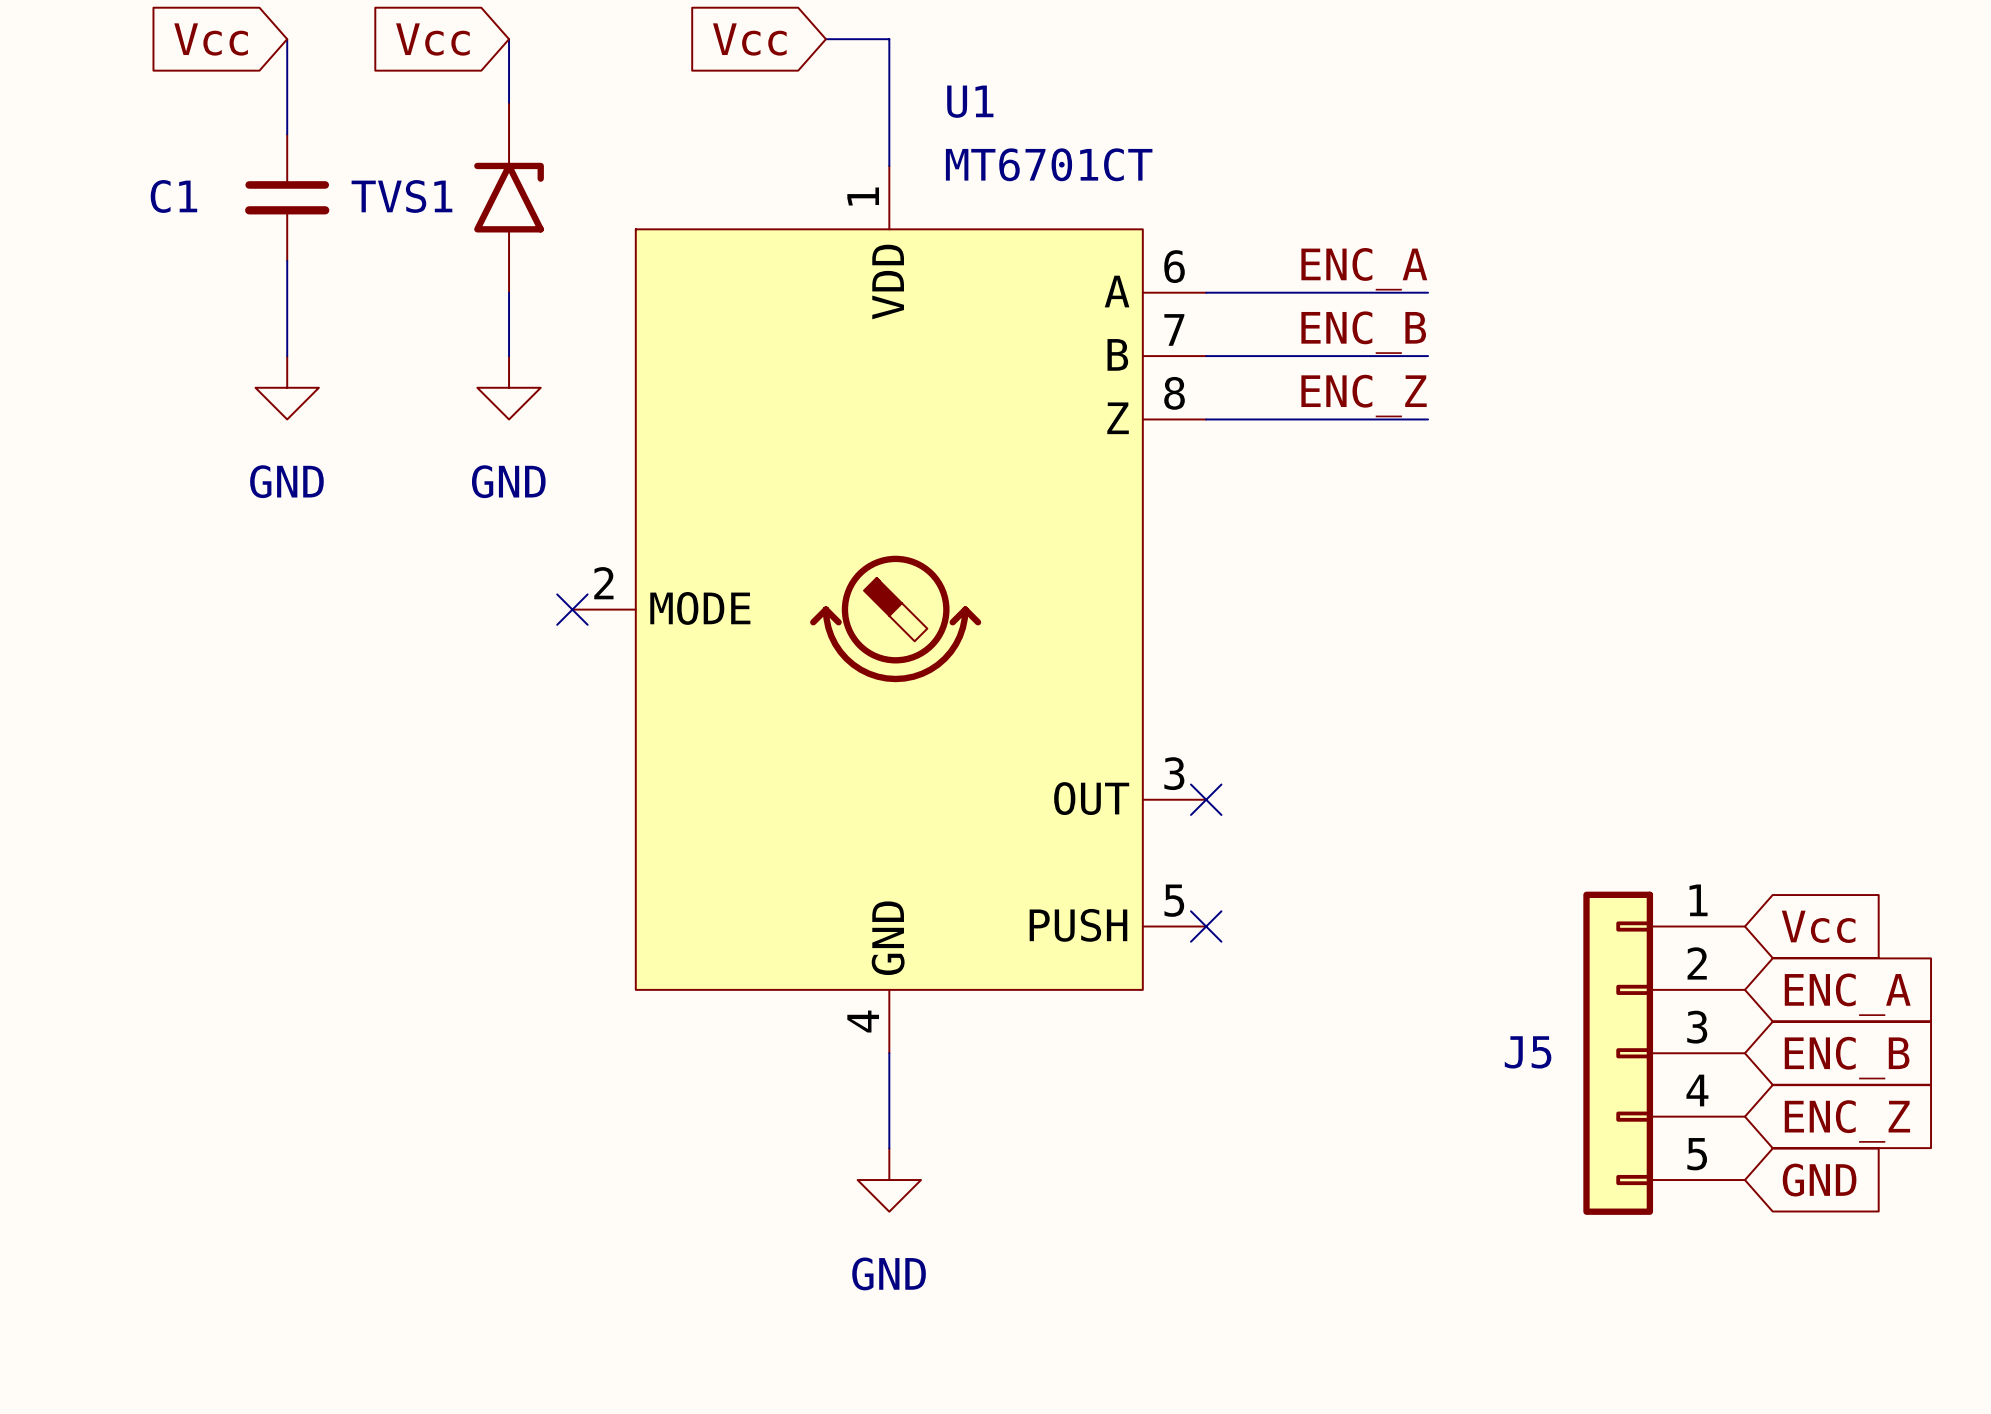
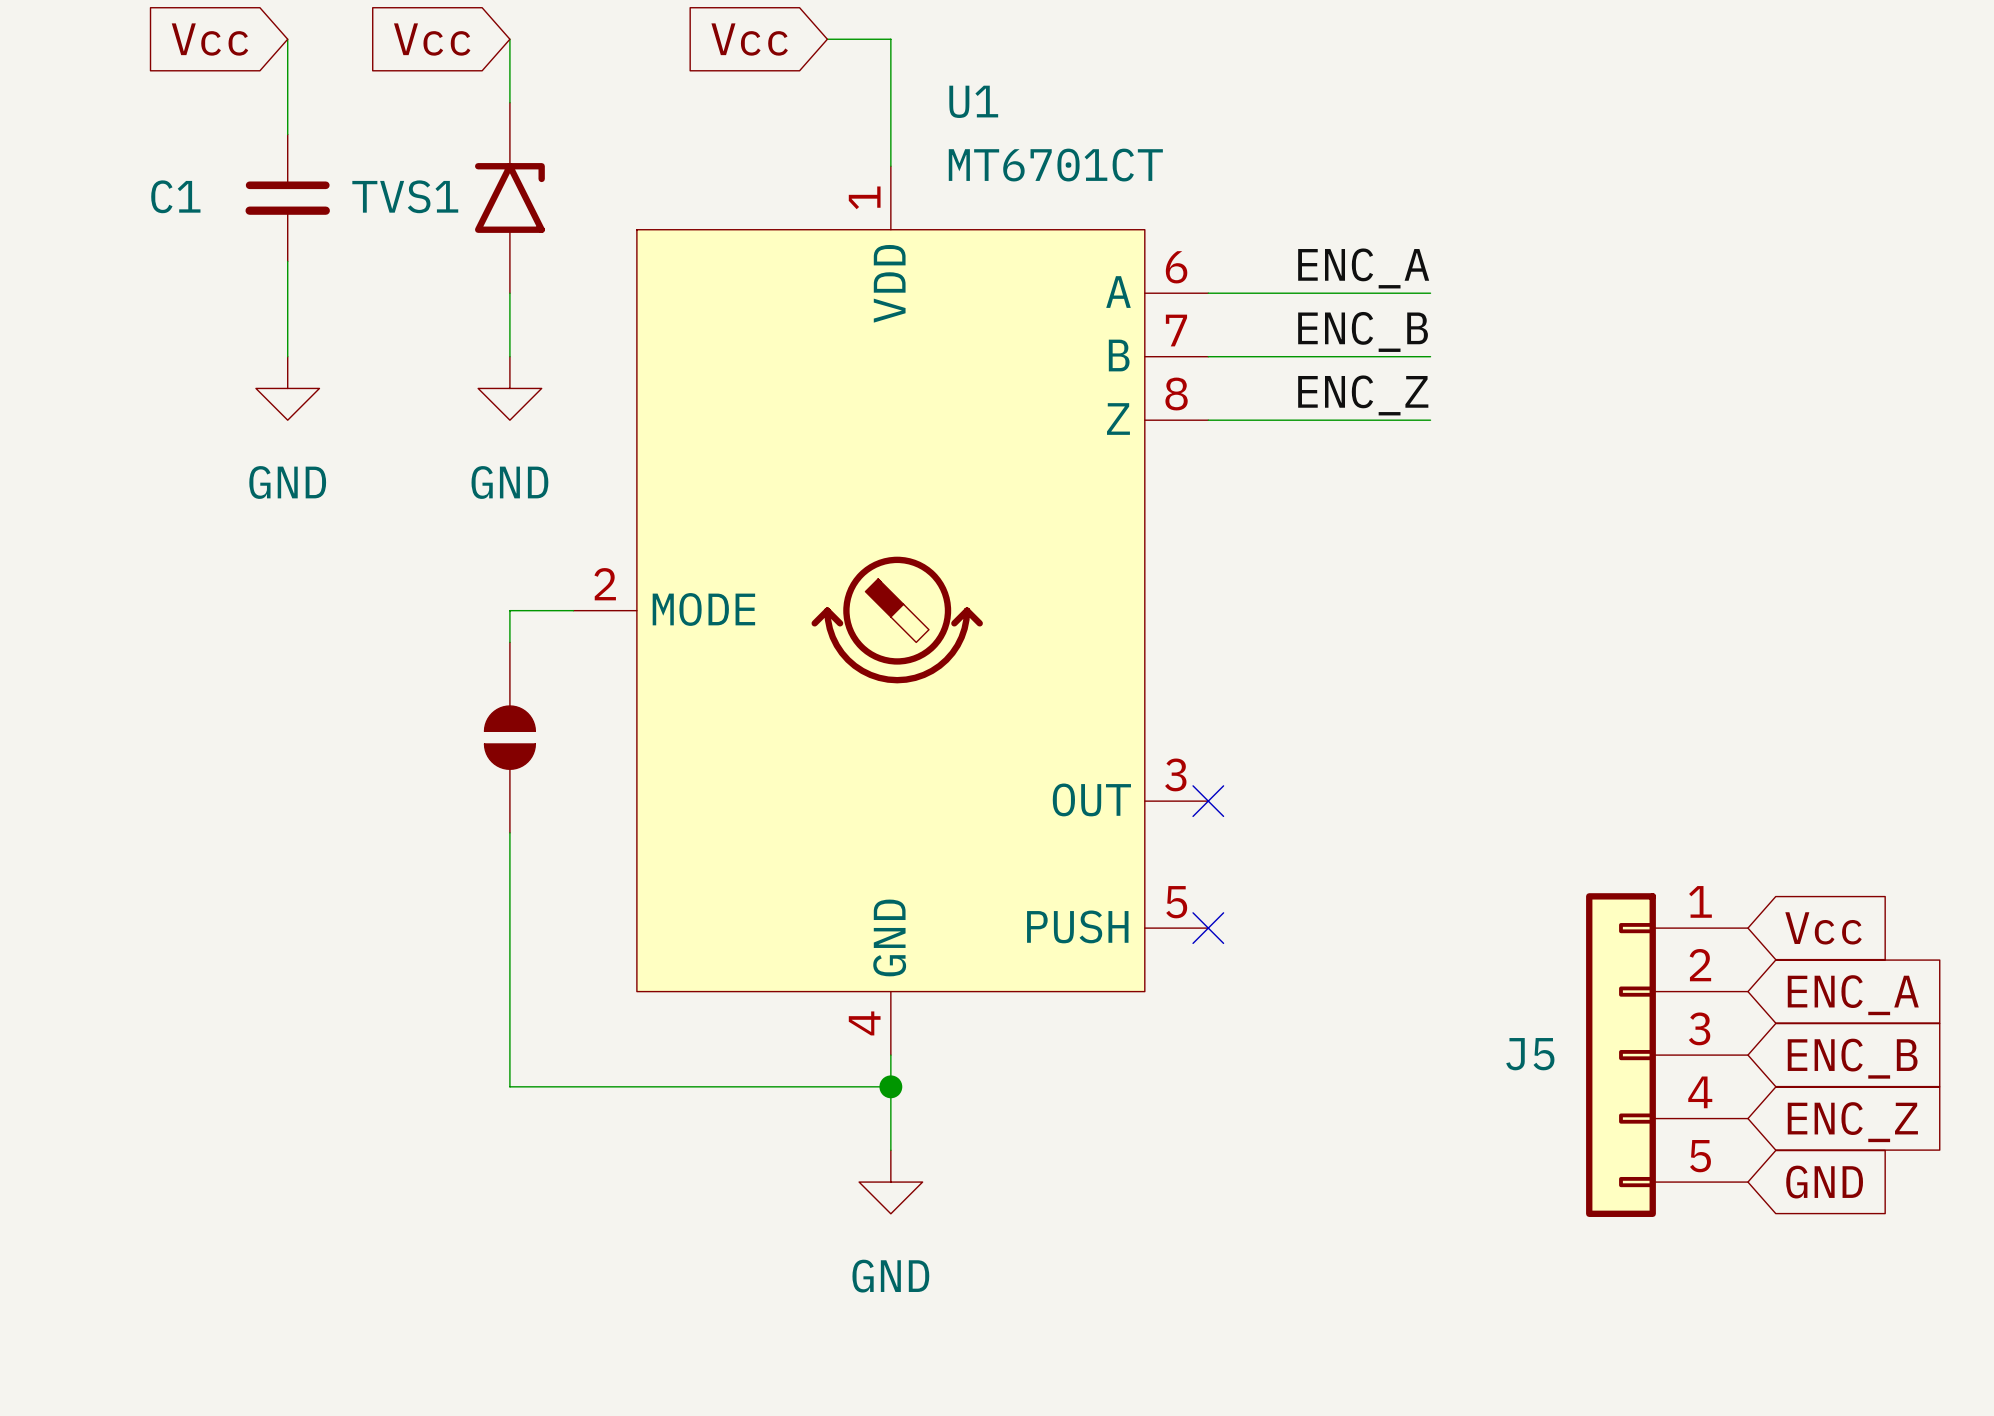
wire: none -> (573, 610) (509, 610) (509, 642)
no-connect mark: (572, 609) -> none
part: none -> (509, 737)
wire: none -> (509, 832) (509, 1086) (890, 1086)
junction: none -> (890, 1086)

